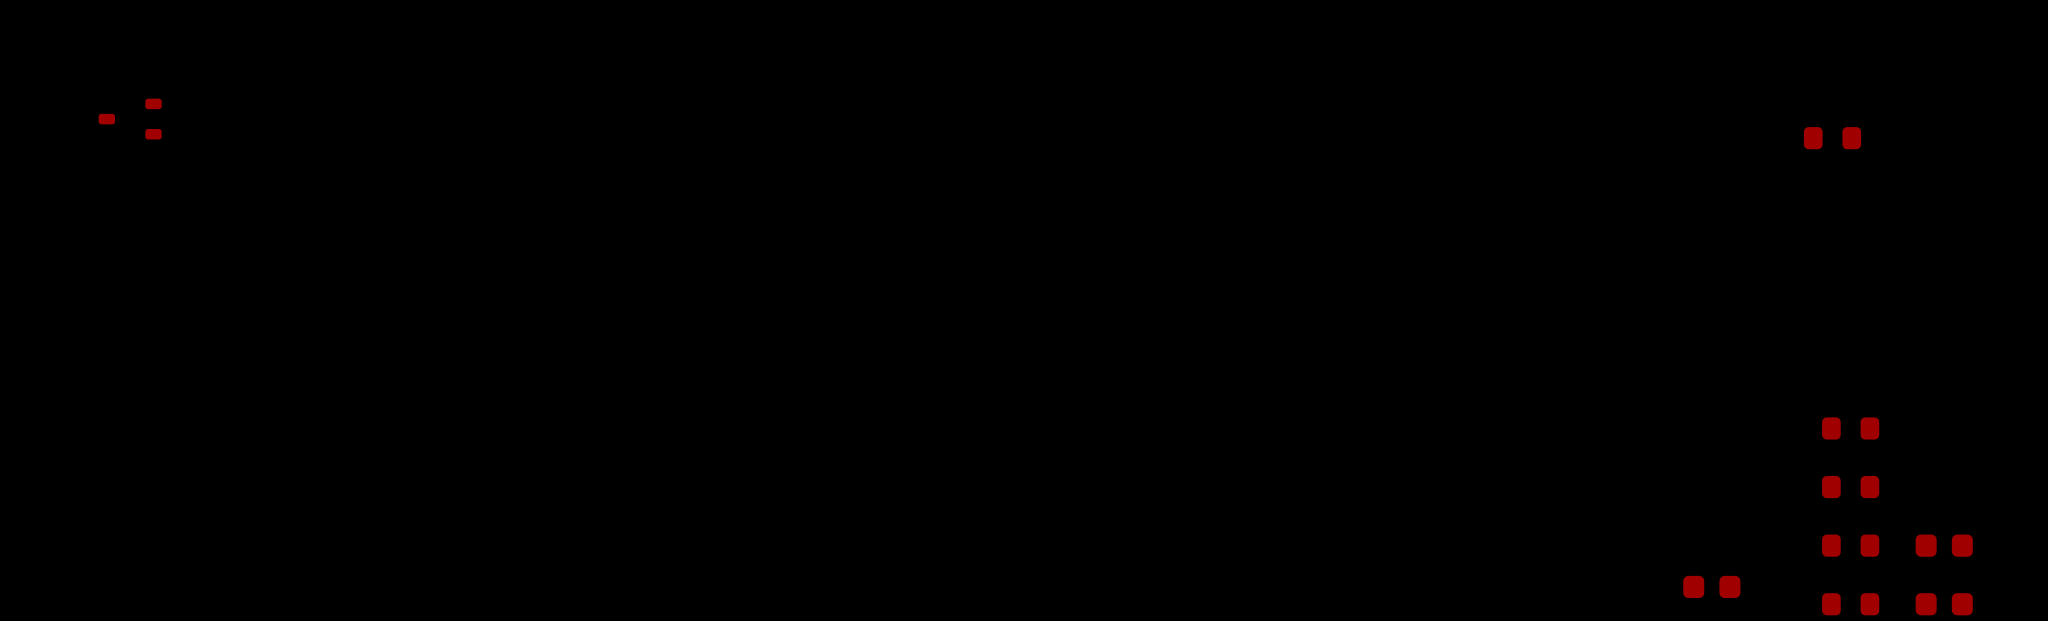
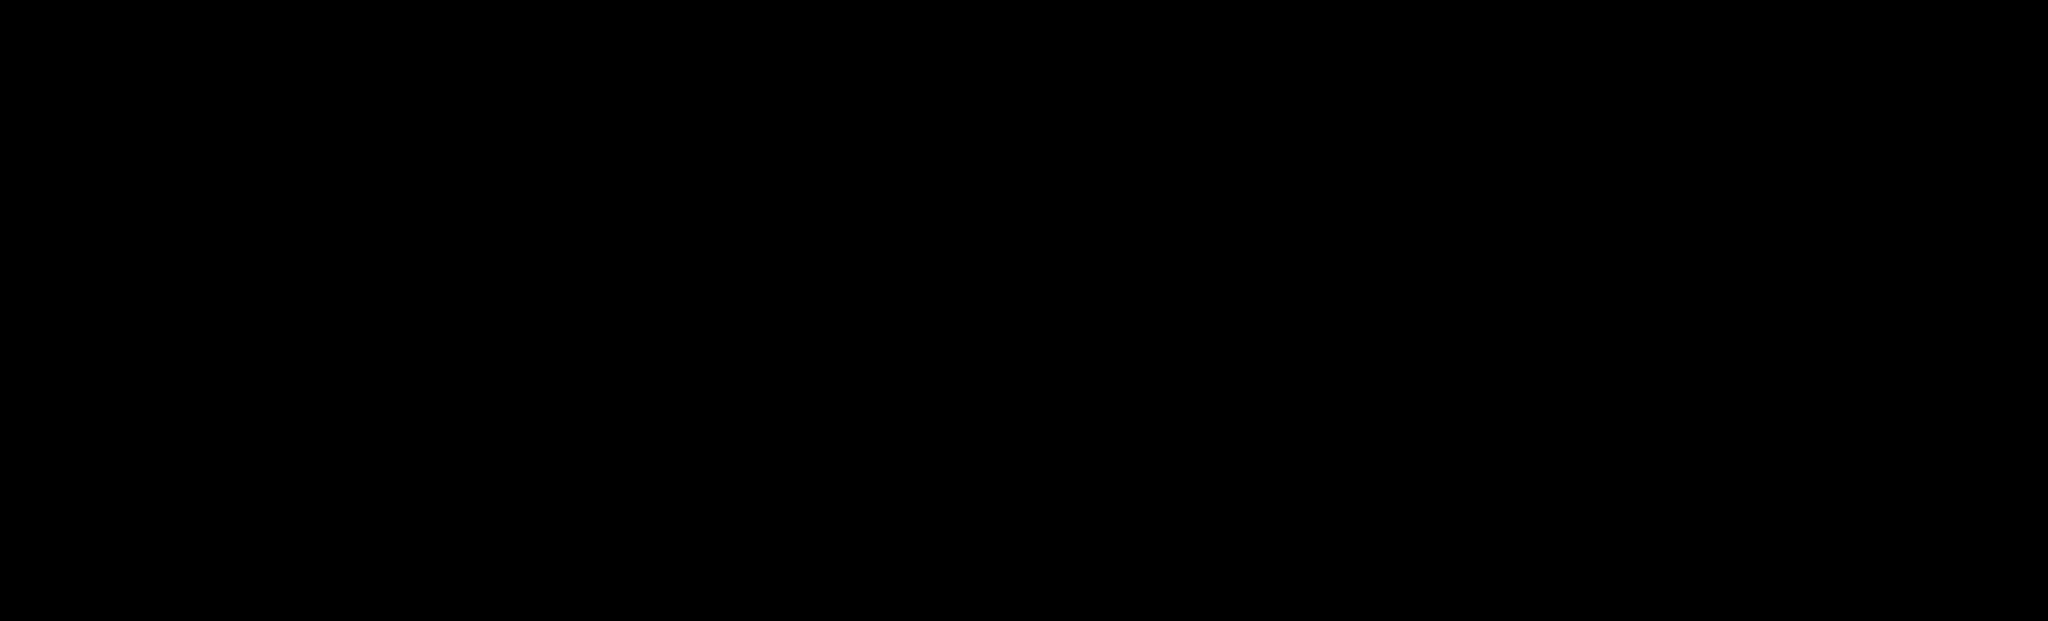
part: (130, 119) -> none
part: (1832, 138) -> none
part: (1850, 428) -> none
part: (1850, 487) -> none
part: (1850, 545) -> none
part: (1944, 545) -> none
part: (1711, 586) -> none
part: (1850, 604) -> none
part: (1944, 604) -> none

